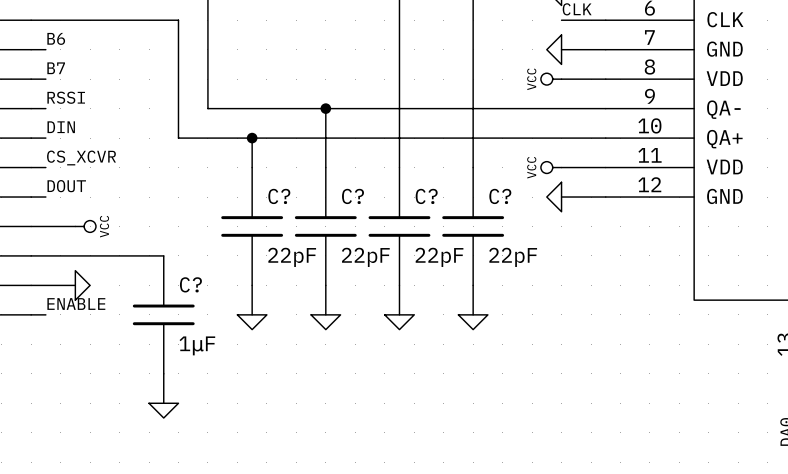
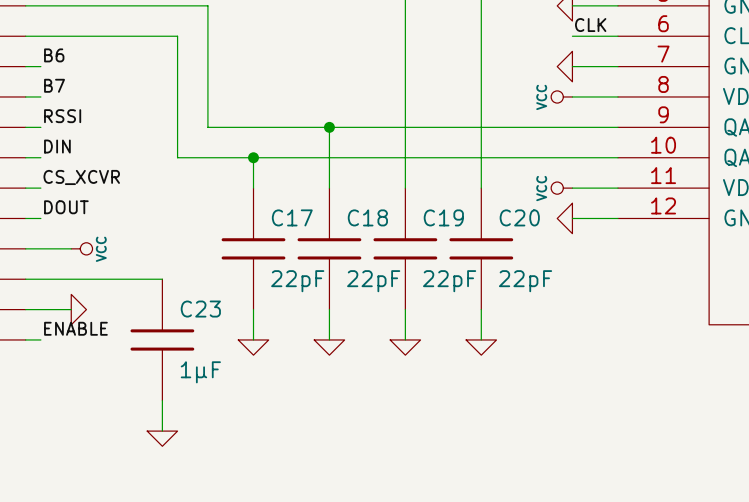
C? name: C? (279, 196) -> C17 (292, 217)
C? name: C? (353, 196) -> C18 (367, 217)
C? name: C? (426, 196) -> C19 (443, 217)
C? name: C? (500, 196) -> C20 (519, 217)
C? name: C? (190, 284) -> C23 (200, 309)

